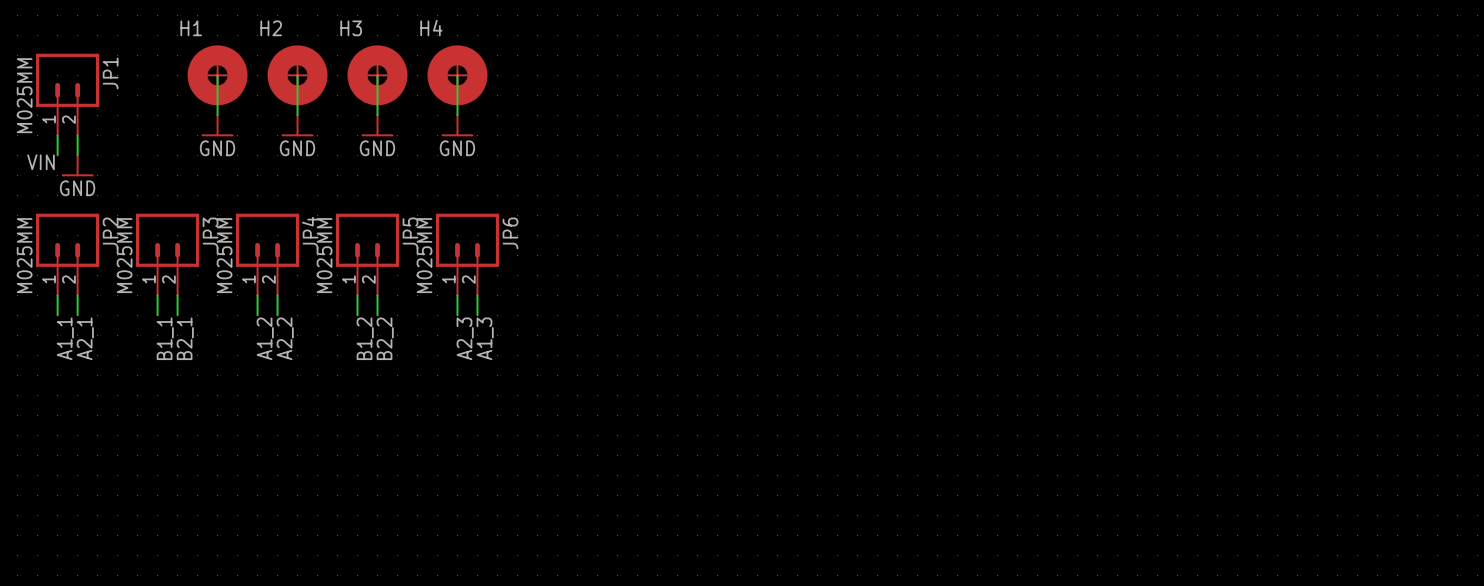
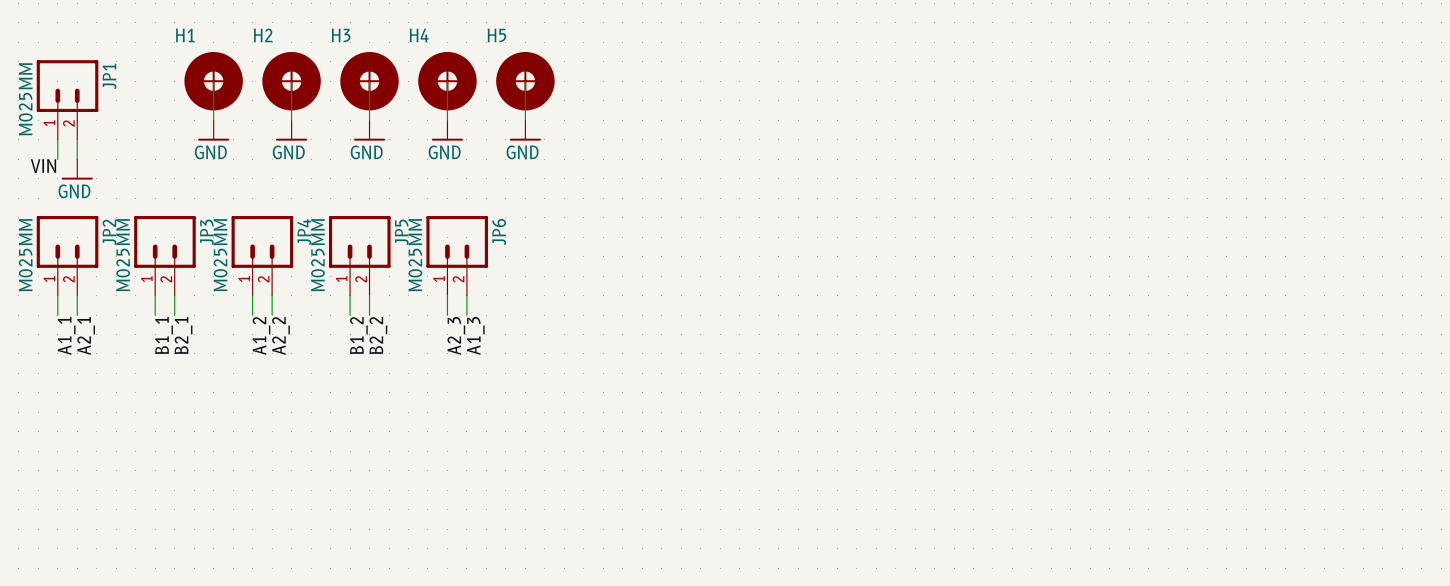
wire: none -> (525, 81) (525, 120)
H5: none -> (525, 81)
power symbol: none -> GND (525, 130)

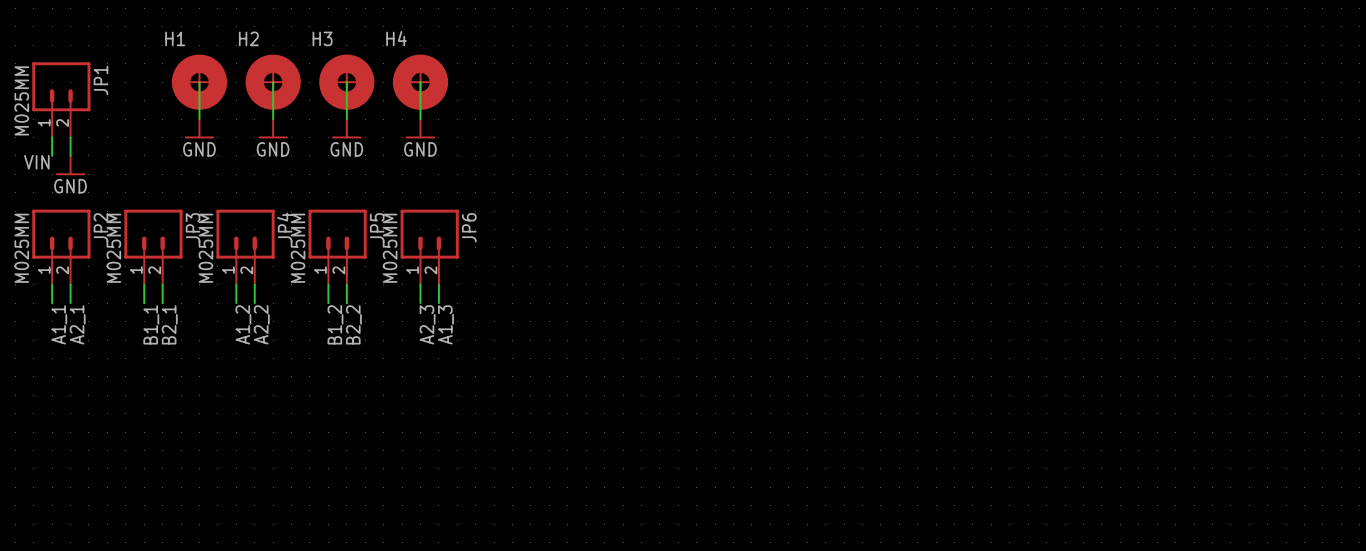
wire: (525, 81) (525, 120) -> none
H5: (525, 81) -> none
power symbol: GND (525, 130) -> none

